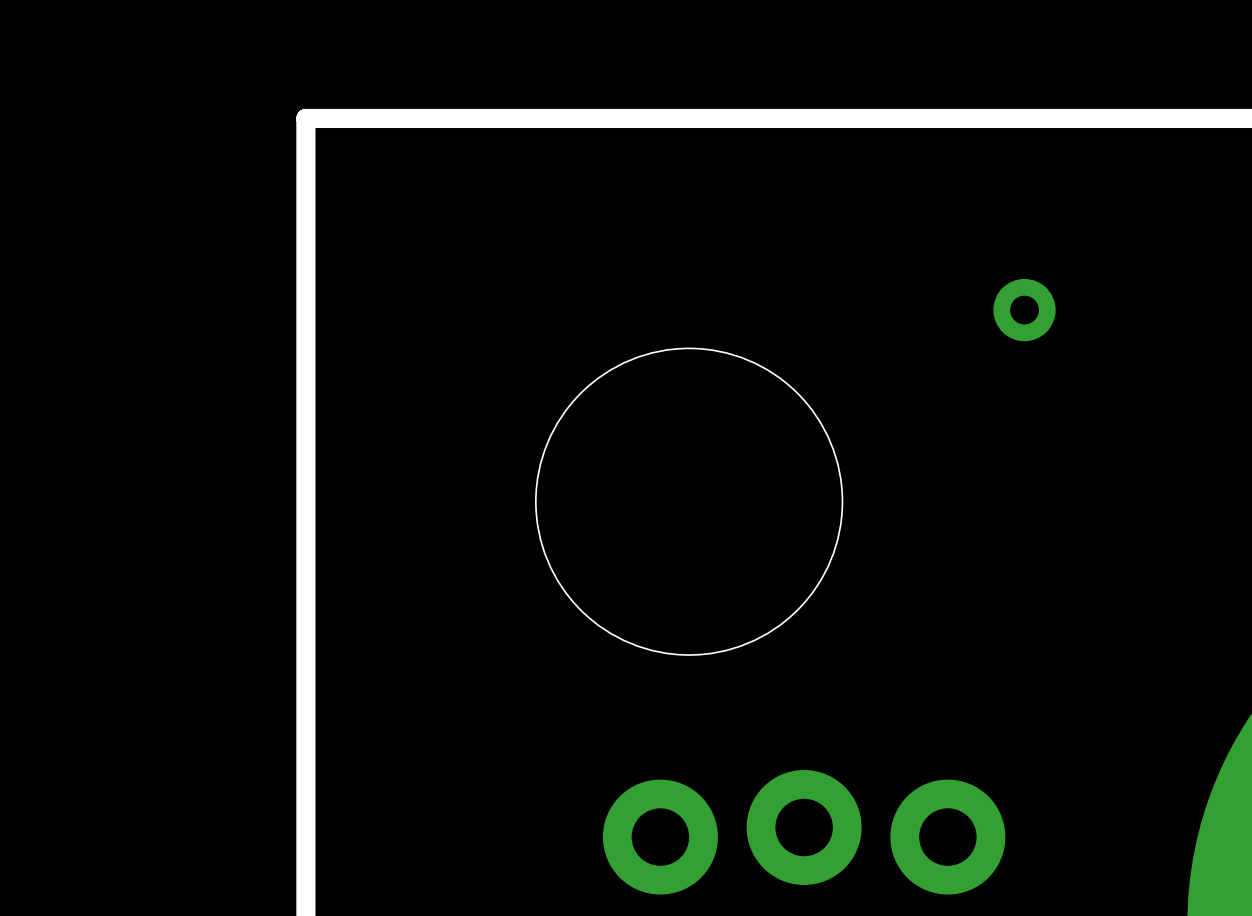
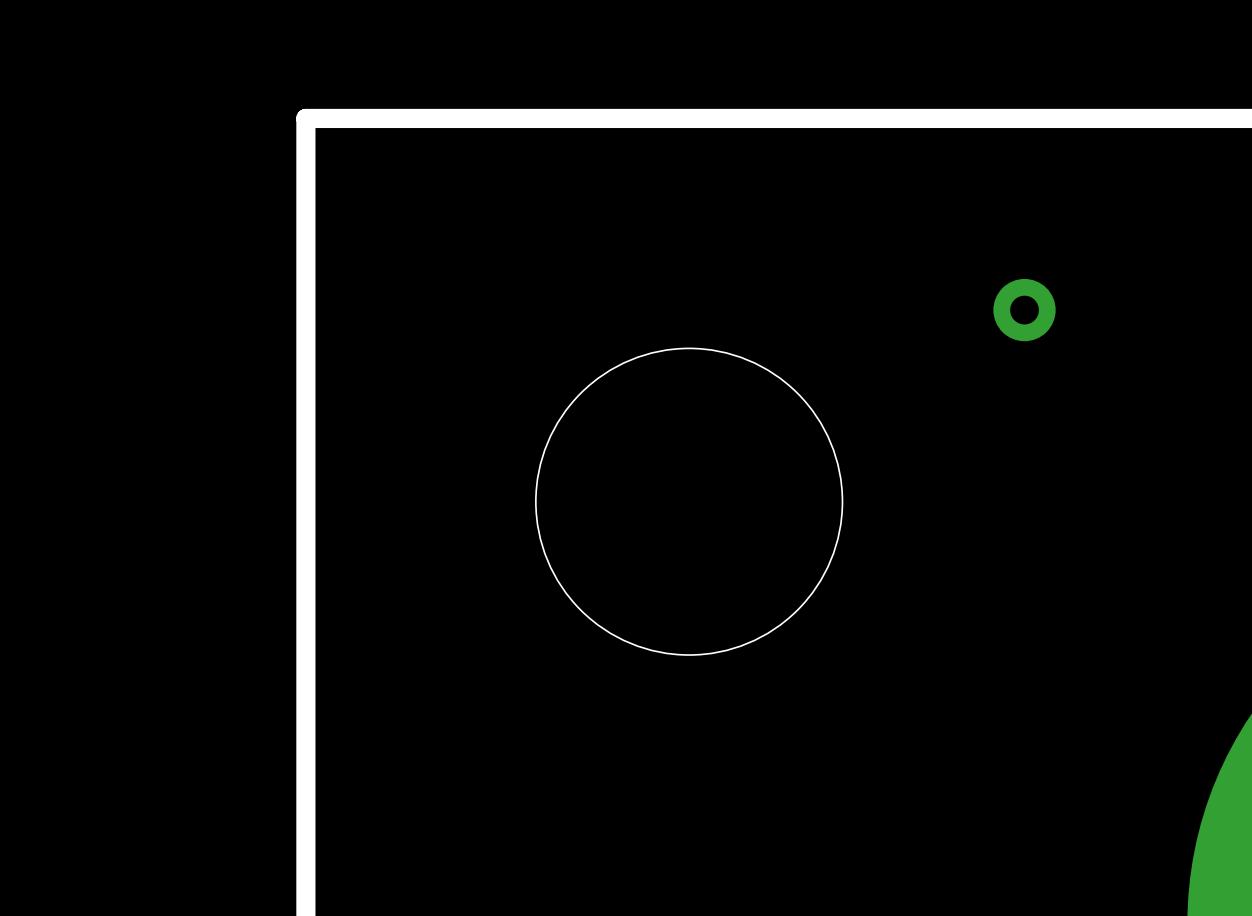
via: (804, 827) -> none
via: (660, 837) -> none
via: (947, 837) -> none

